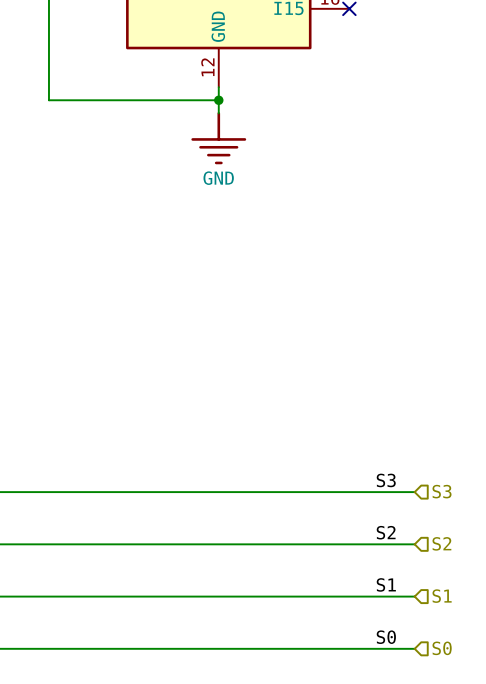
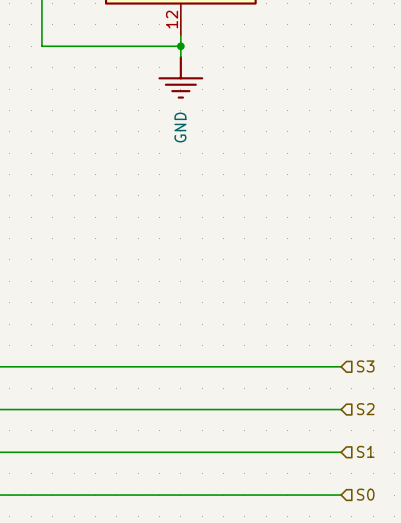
power symbol text rotation: 0° (218, 178) -> 90° counterclockwise (180, 127)
label: S3 (386, 480) -> none
label: S2 (386, 532) -> none
label: S1 (386, 584) -> none
label: S0 (386, 637) -> none

